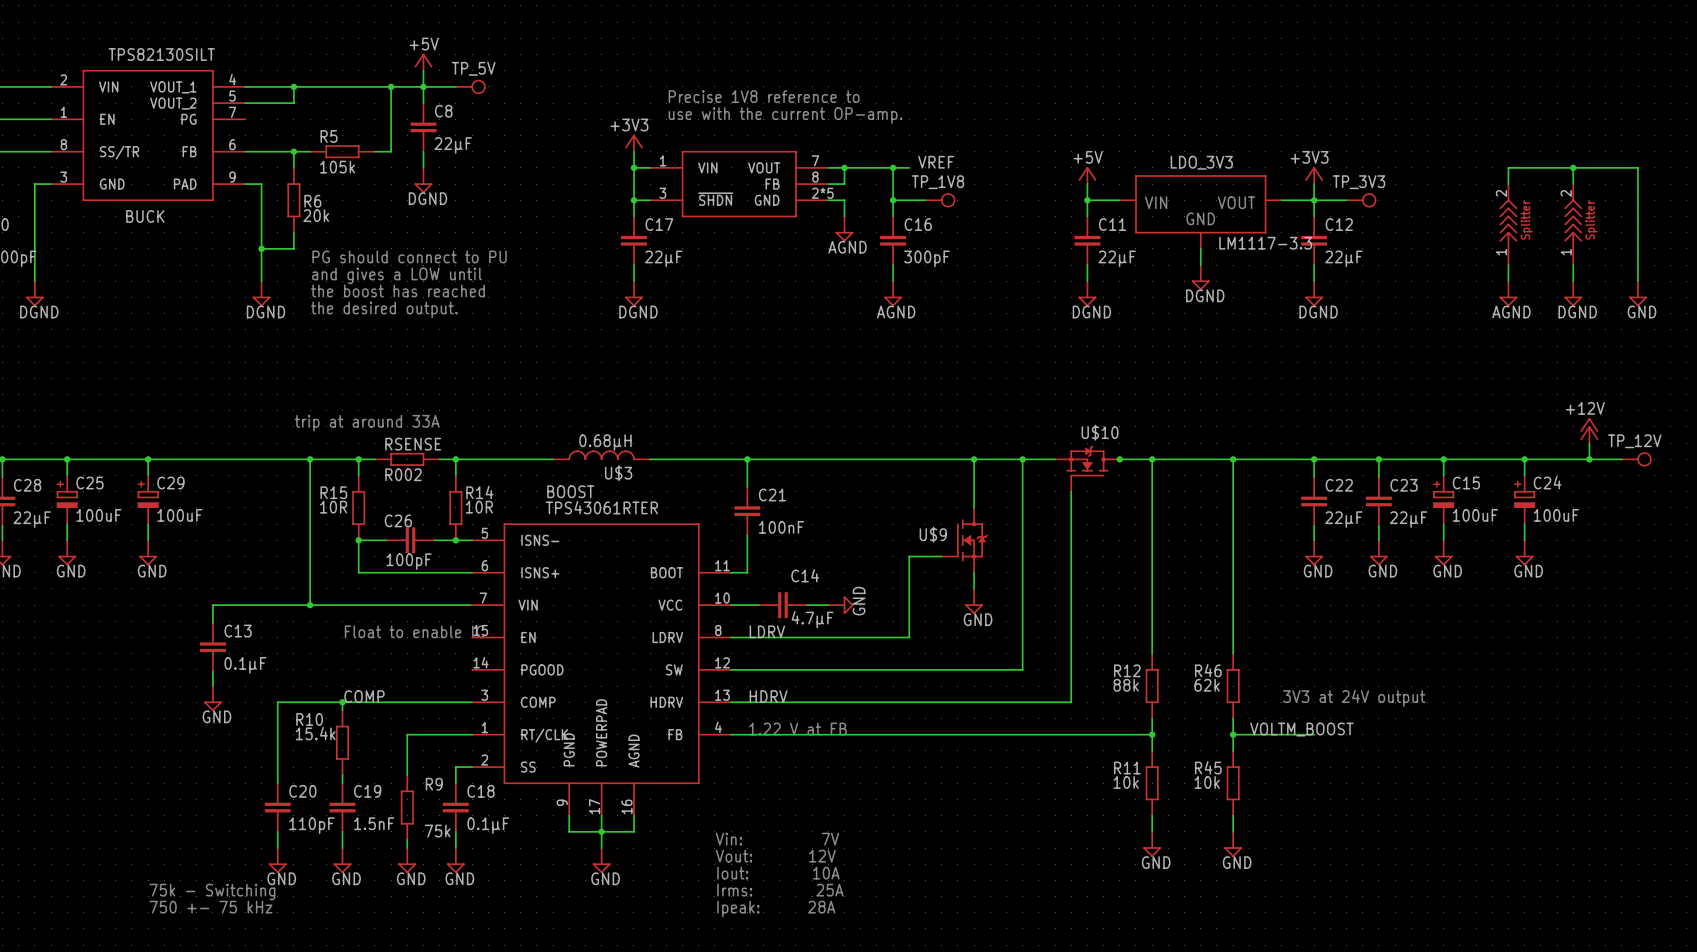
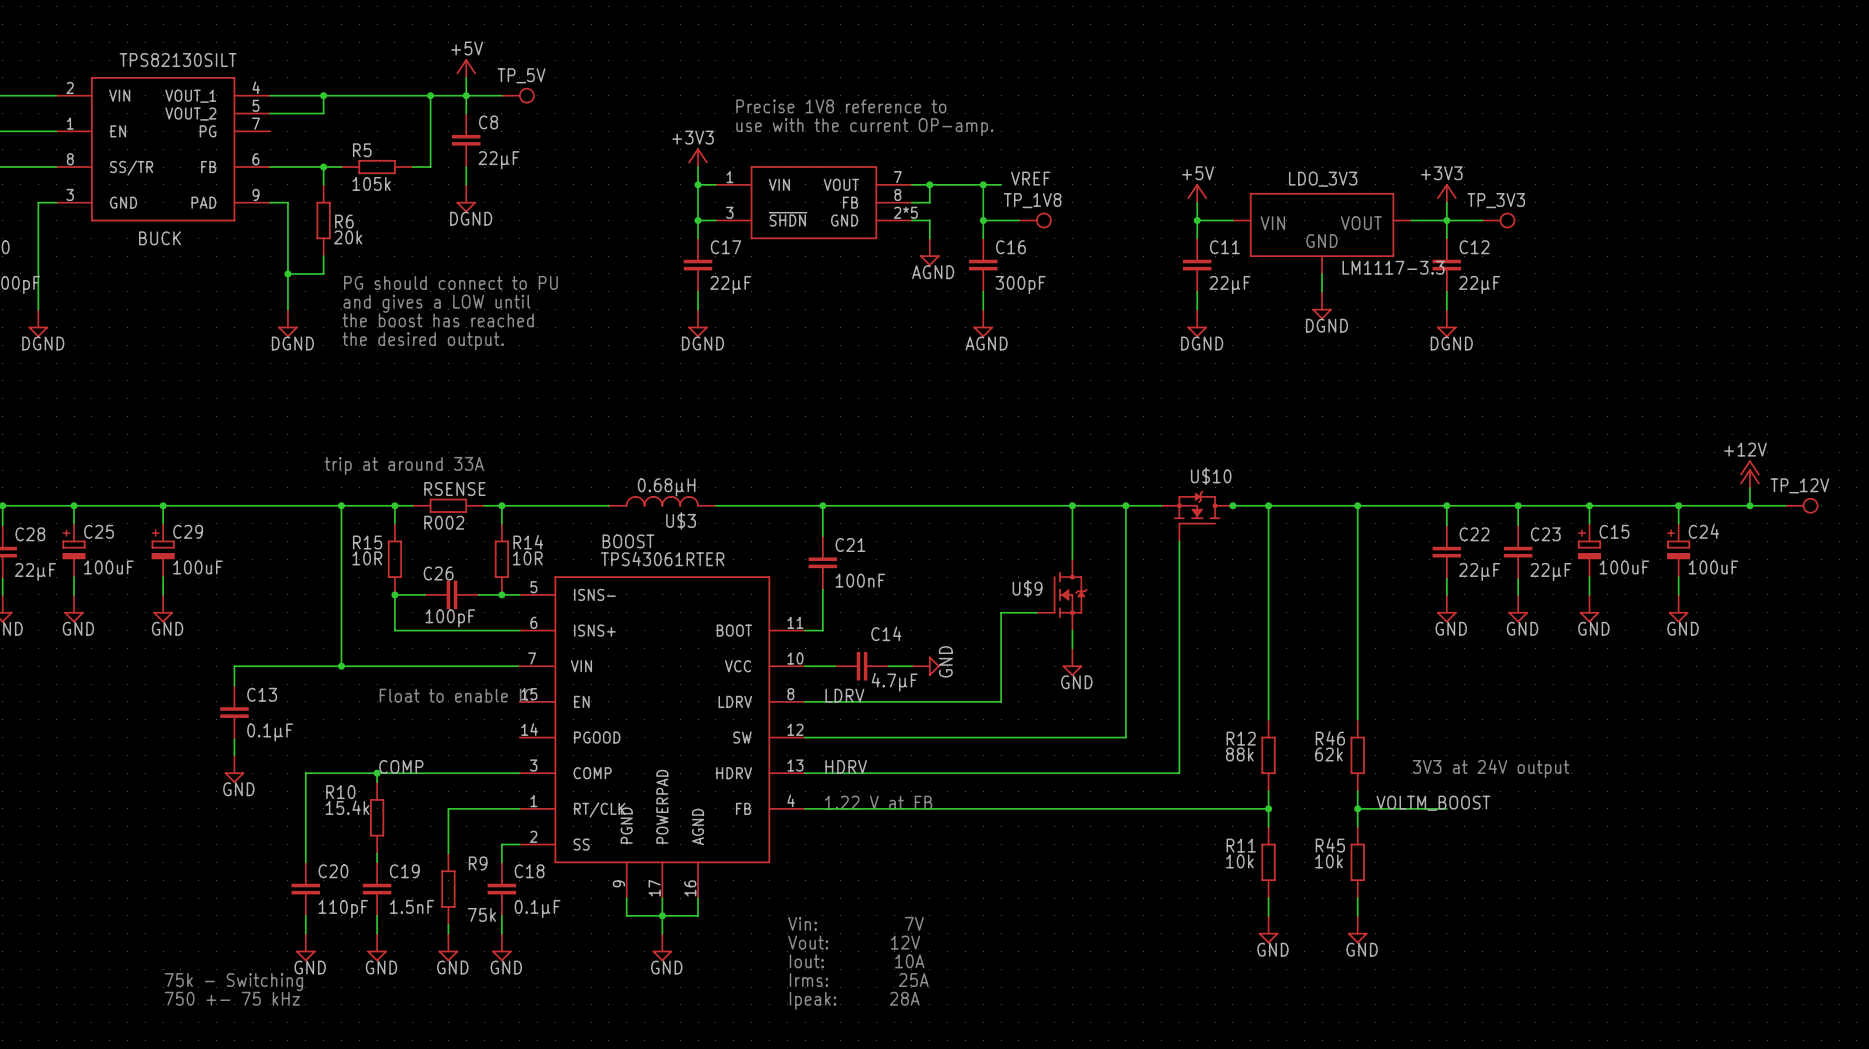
wire: (1573, 167) (1573, 184) -> none
junction: (1573, 167) -> none
wire: (1508, 184) (1508, 167) (1638, 167) (1638, 281) -> none
part: (1508, 224) -> none
part: (1573, 224) -> none
wire: (1508, 265) (1508, 281) -> none
wire: (1573, 265) (1573, 281) -> none
power symbol: AGND (1508, 293) -> none
power symbol: DGND (1573, 293) -> none
power symbol: GND (1638, 293) -> none

